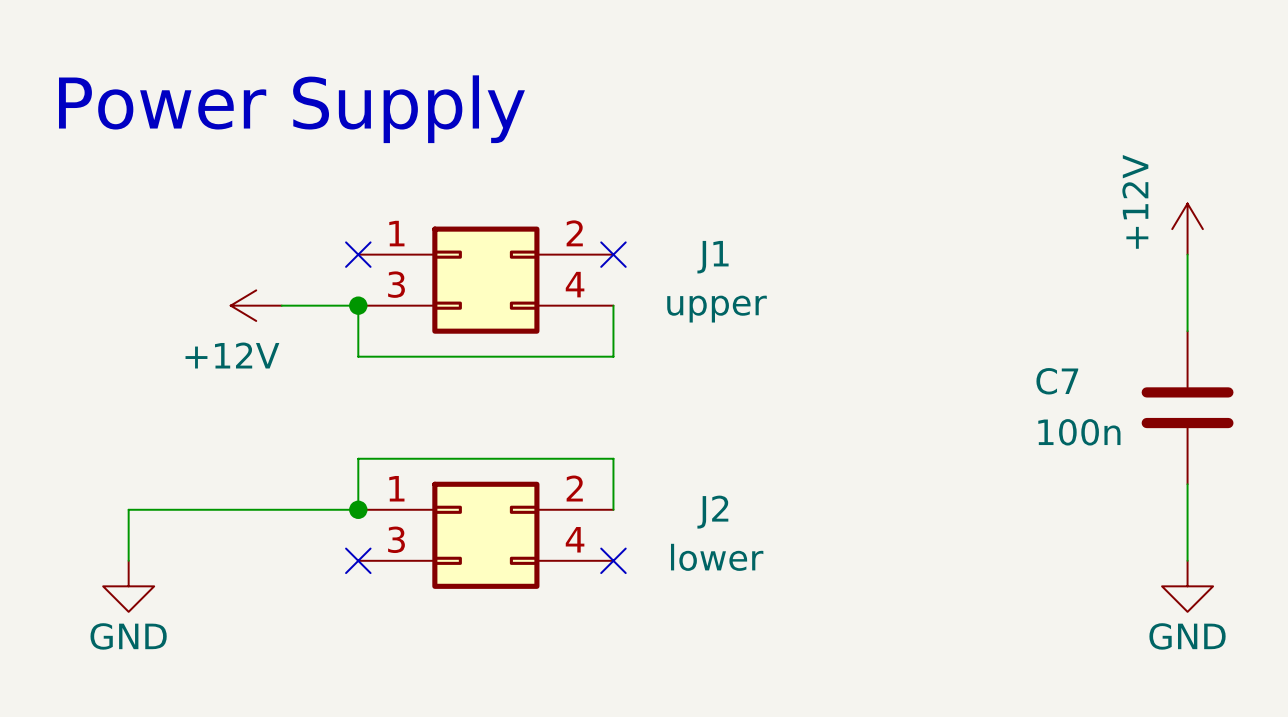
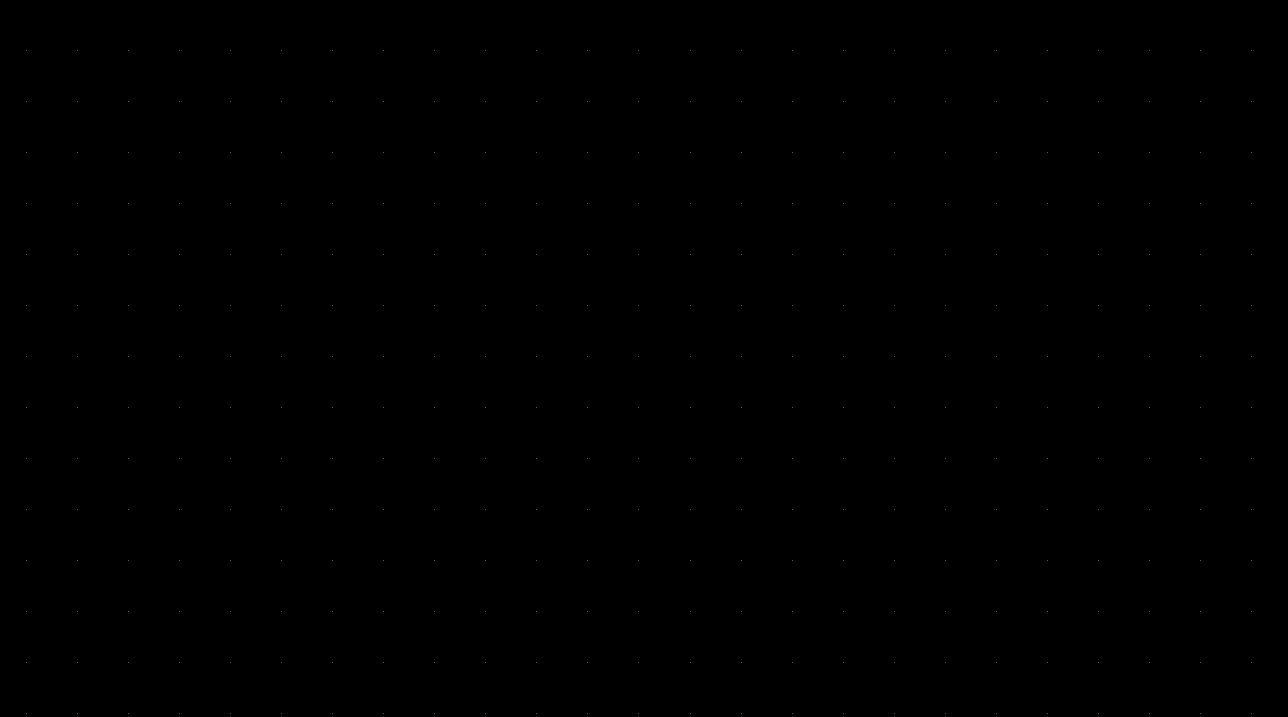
text: Power Supply (291, 109) -> none
power symbol: +12V (1187, 229) -> none
no-connect mark: (358, 254) -> none
no-connect mark: (613, 254) -> none
wire: (1187, 254) (1187, 331) -> none
J1: upper (485, 280) -> none
power symbol: +12V (256, 305) -> none
wire: (281, 305) (358, 305) (358, 356) (613, 356) (613, 305) -> none
junction: (358, 305) -> none
C7: 100n (1187, 407) -> none
wire: (1187, 484) (1187, 560) -> none
junction: (358, 509) -> none
wire: (613, 509) (613, 458) (358, 458) (358, 509) (128, 509) (128, 560) -> none
J2: lower (485, 535) -> none
no-connect mark: (358, 560) -> none
no-connect mark: (613, 560) -> none
power symbol: GND (128, 586) -> none
power symbol: GND (1187, 586) -> none

